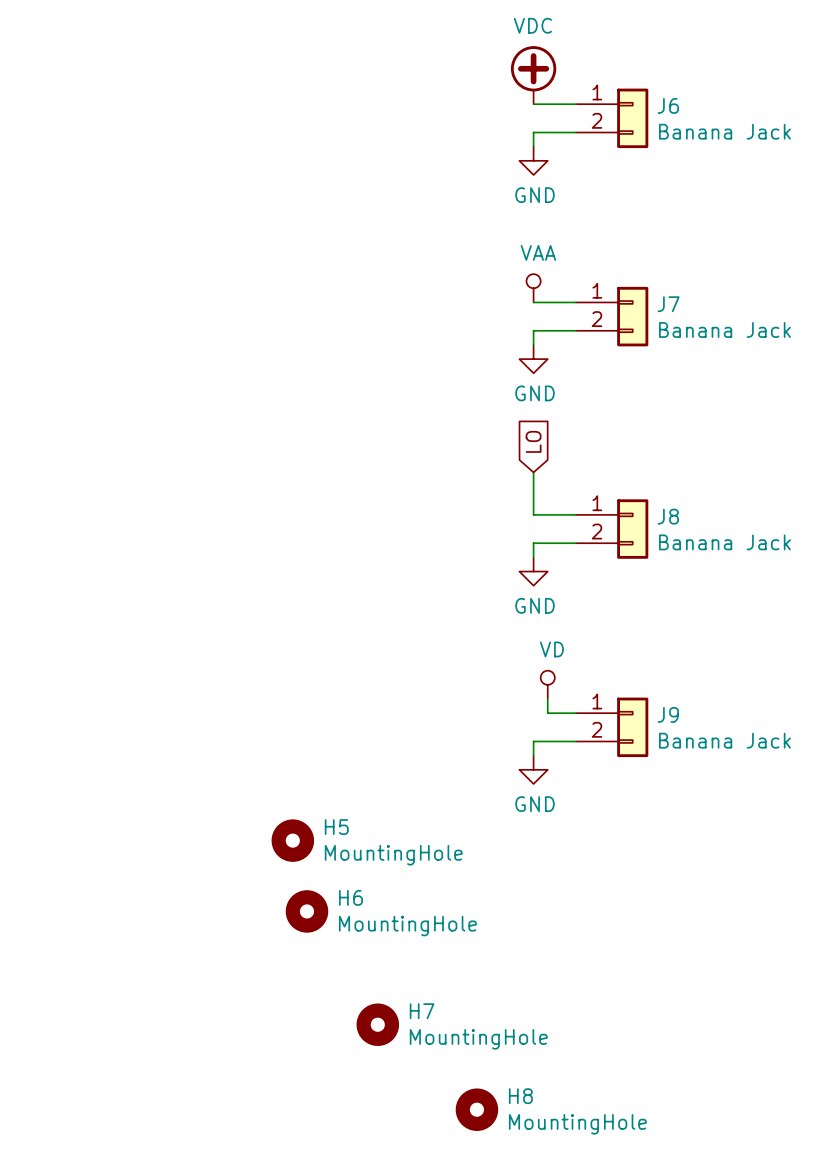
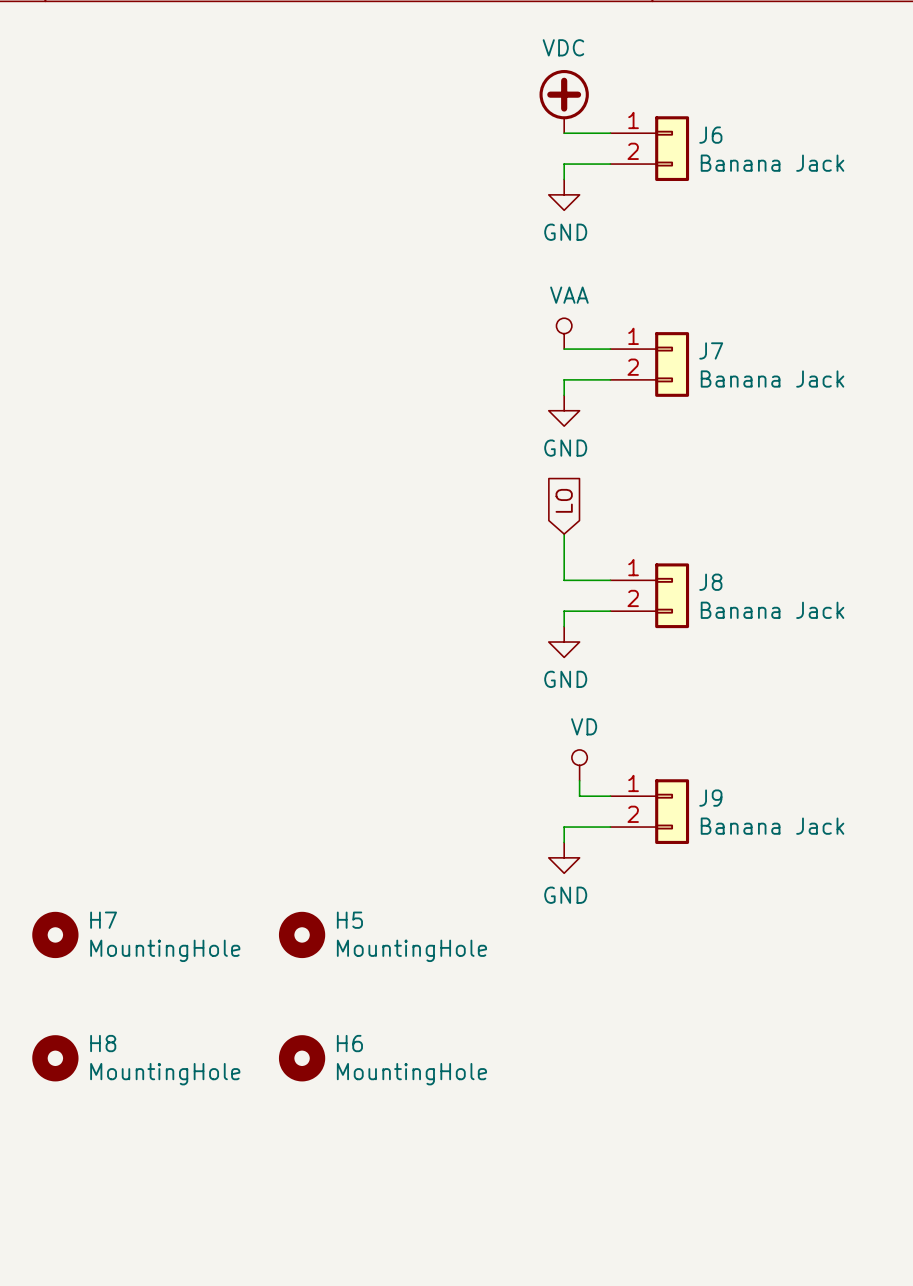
H6 position: (306, 911) -> (302, 1058)
H7 position: (377, 1024) -> (55, 934)
H8 position: (476, 1109) -> (55, 1058)

